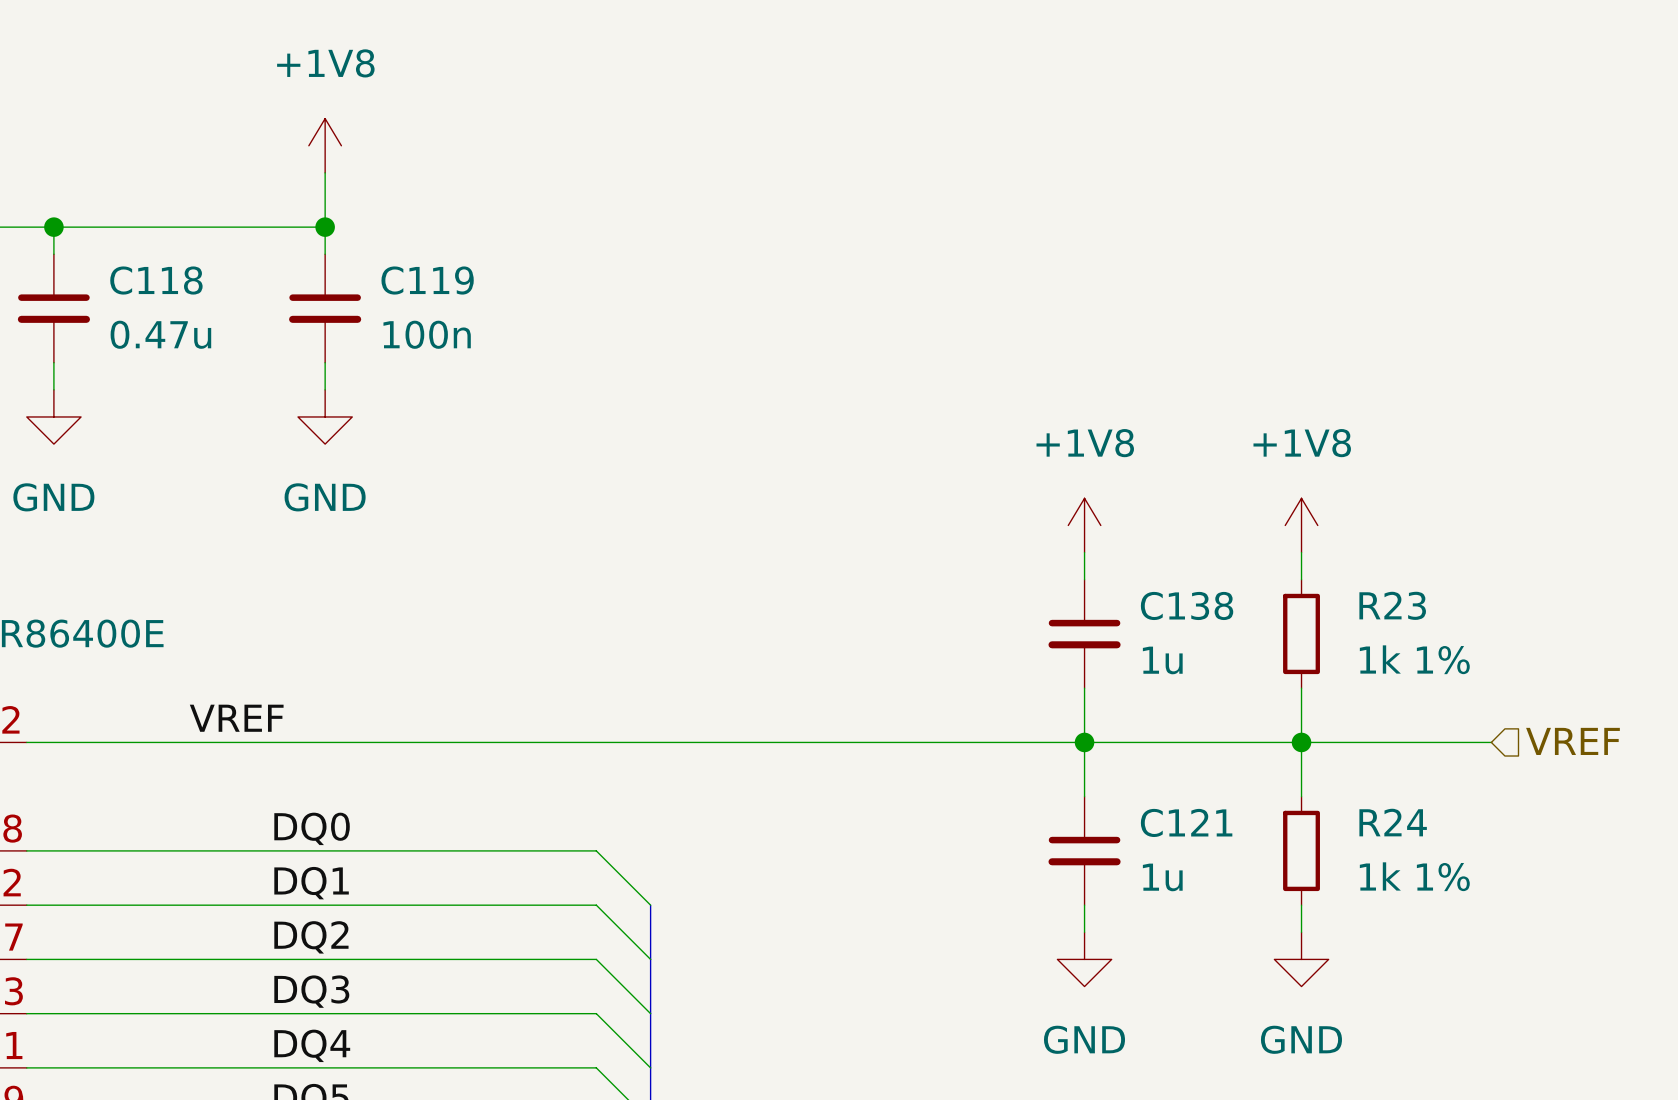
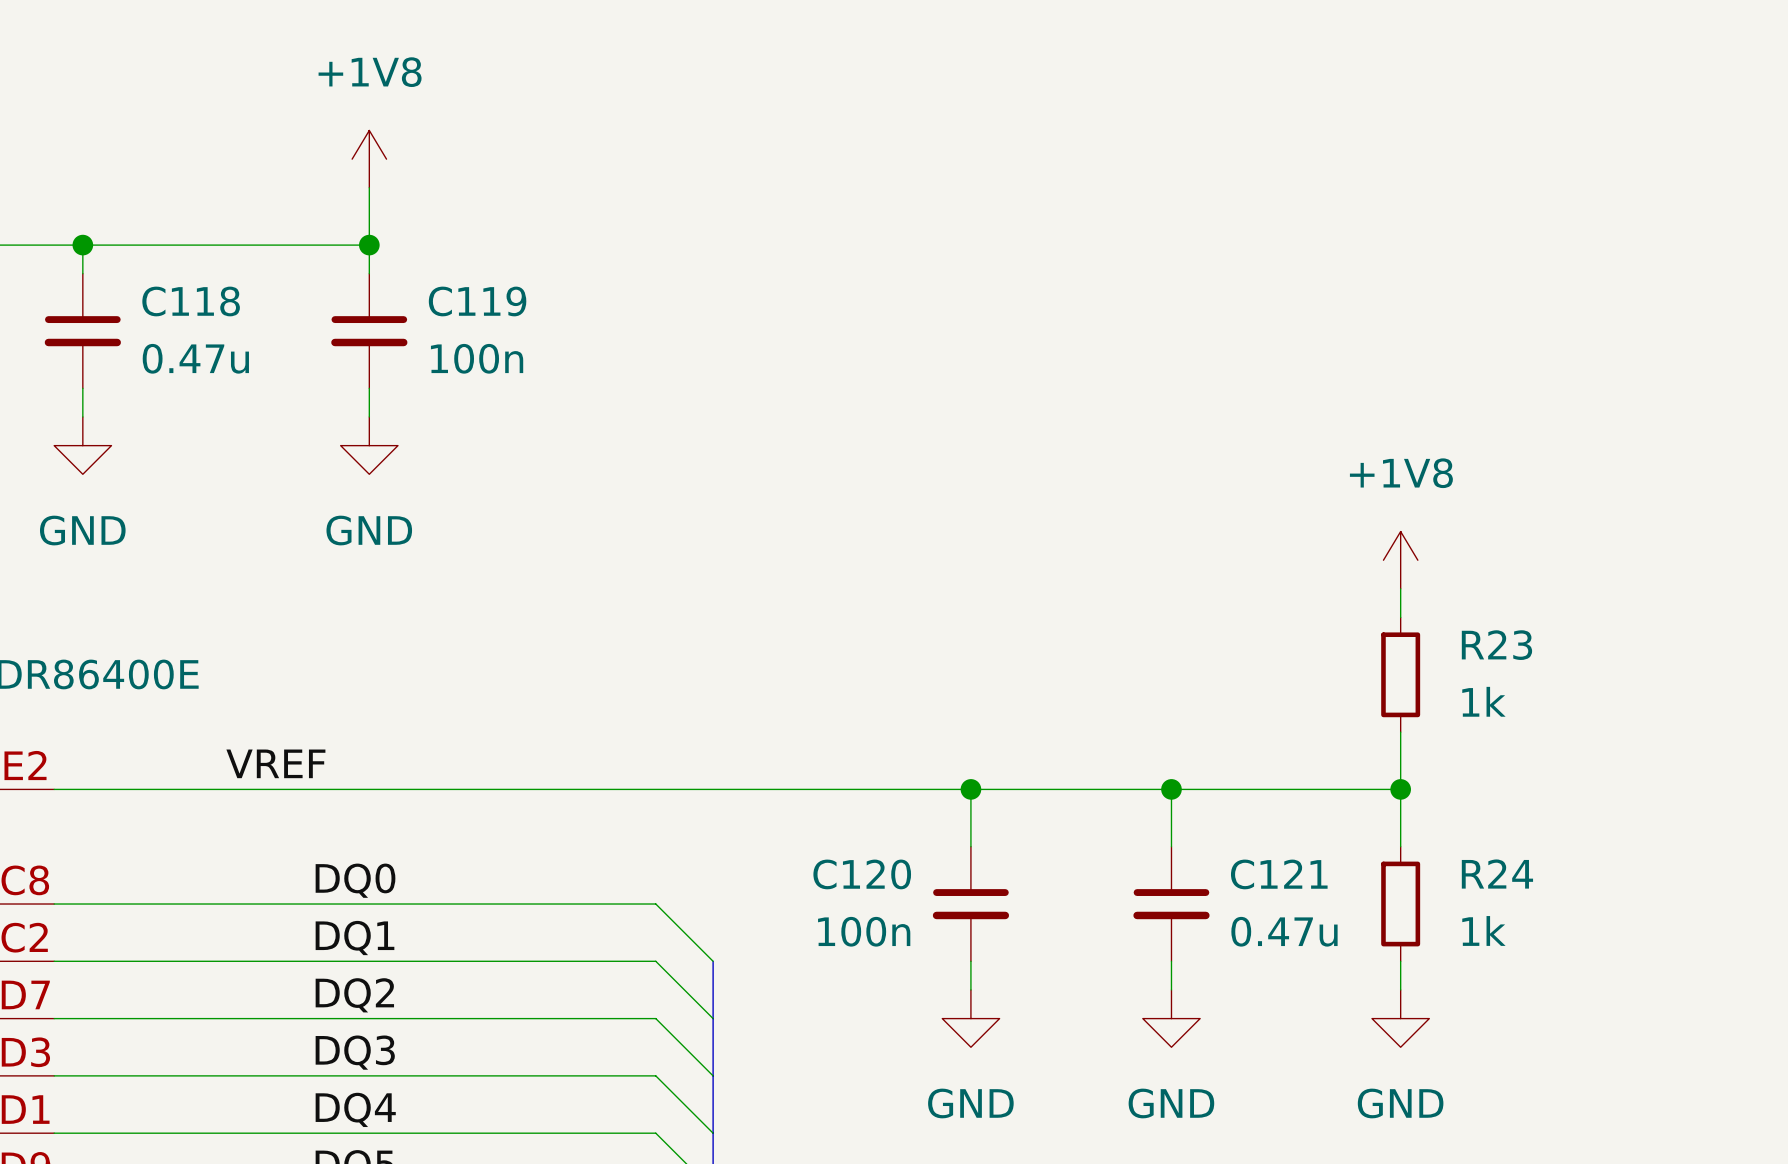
power symbol: +1V8 (1084, 525) -> none
wire: (1084, 552) (1084, 579) -> (970, 961) (970, 989)
C138: 1u (1084, 633) -> none
R23 value: 1k 1% (1414, 659) -> 1k (1483, 701)
wire: (1084, 688) (1084, 742) -> (970, 789) (970, 846)
hierarchical label: VREF (1572, 741) -> none
junction: none -> (970, 789)
wire: (1301, 742) (1491, 742) -> none
C120: none -> 100n (970, 904)
R24 value: 1k 1% (1414, 876) -> 1k (1483, 930)
C121 value: 1u (1162, 877) -> 0.47u (1284, 931)
power symbol: none -> GND (970, 1018)

